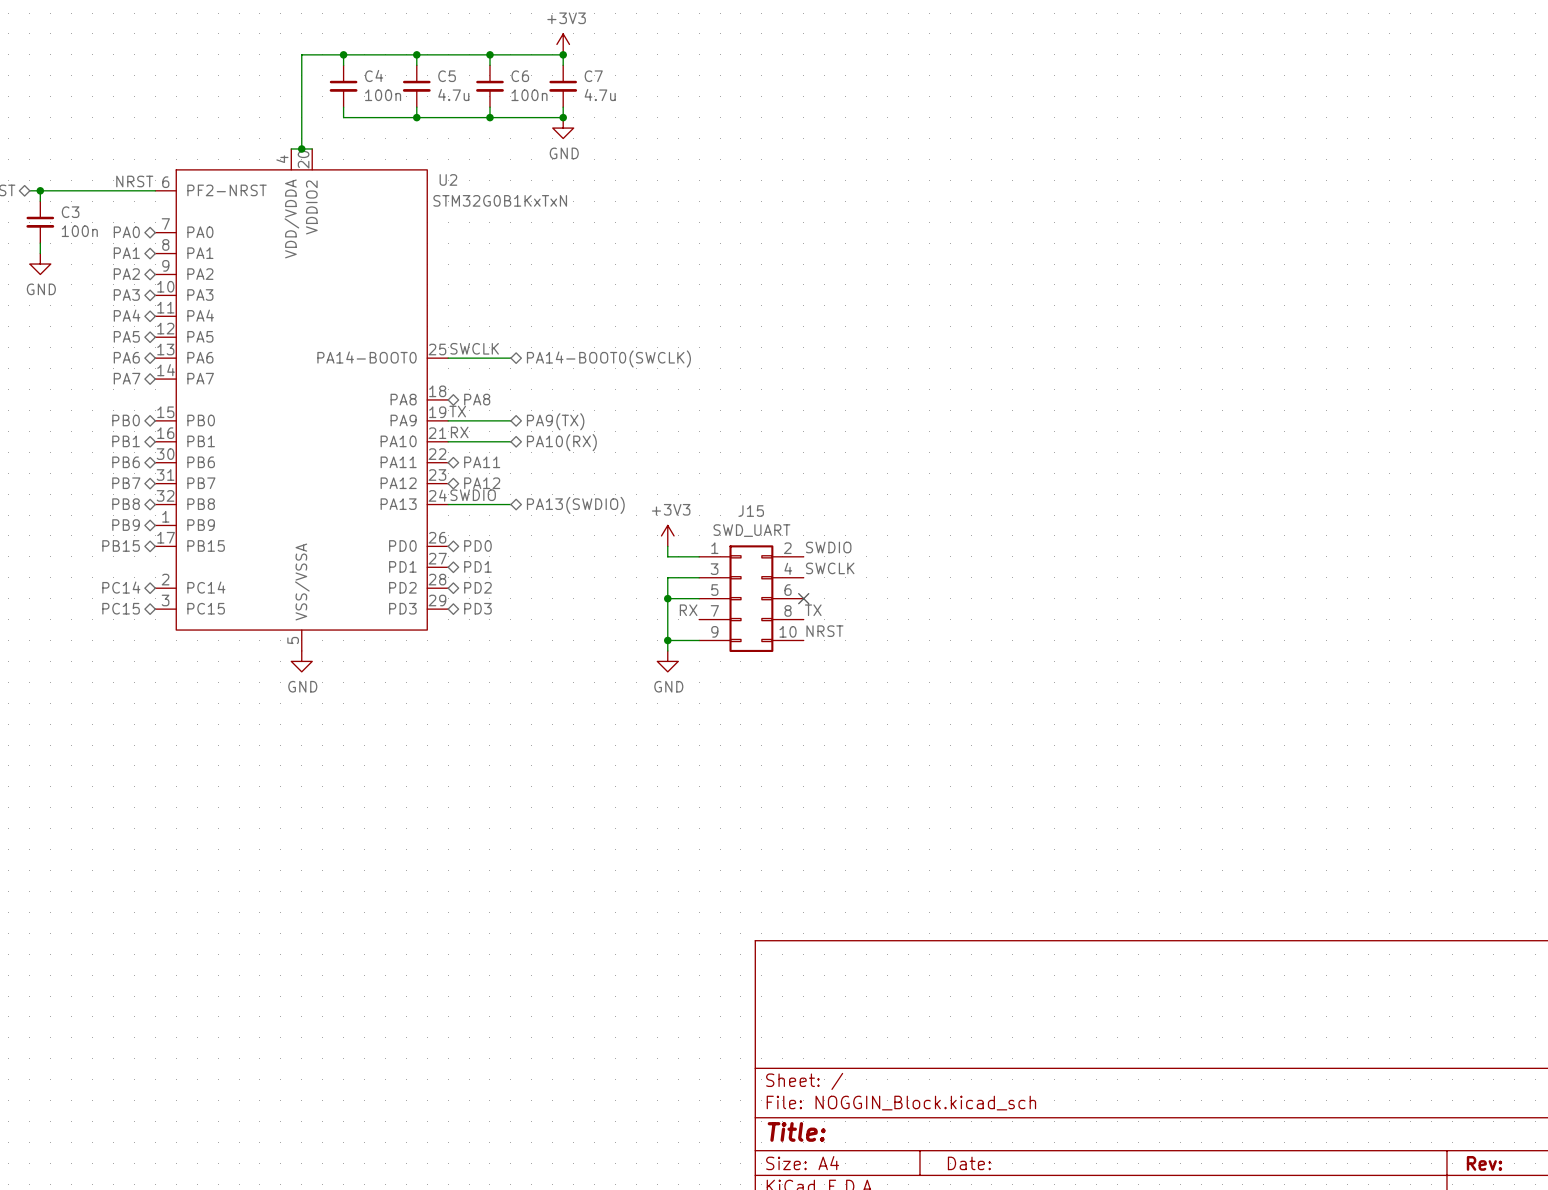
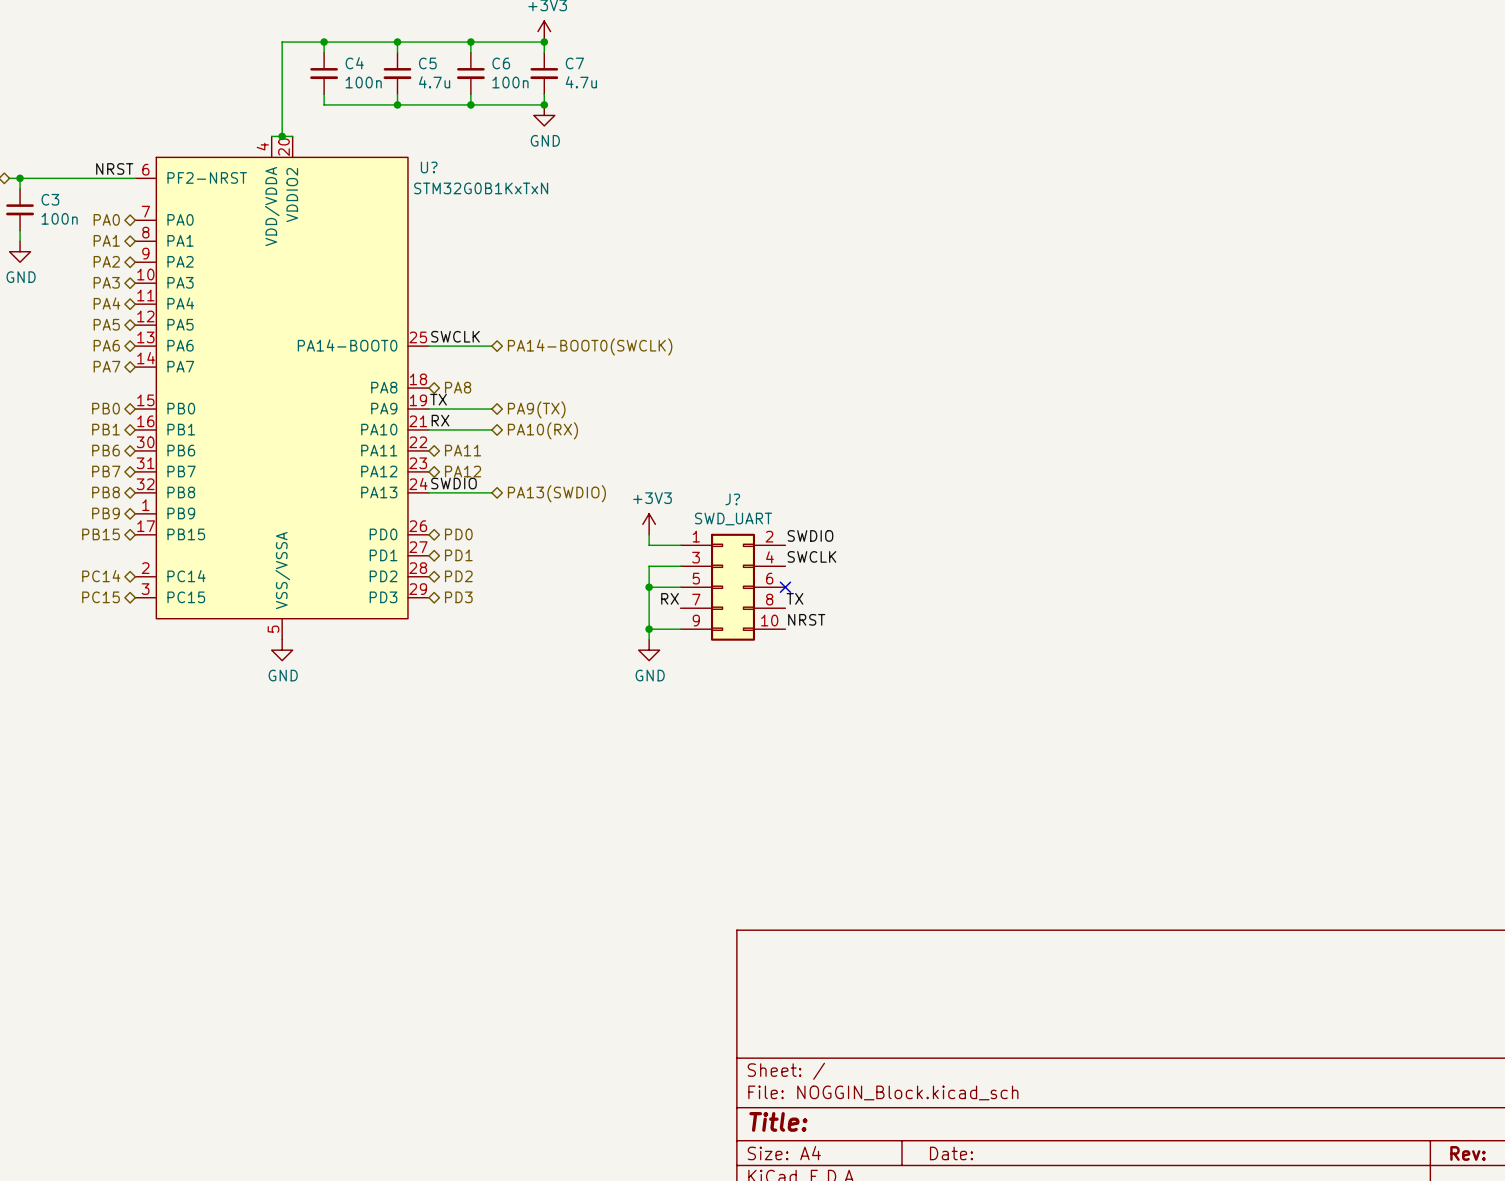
U2 name: U2 (448, 179) -> U? (429, 167)
J15 name: J15 (751, 511) -> J? (732, 499)

